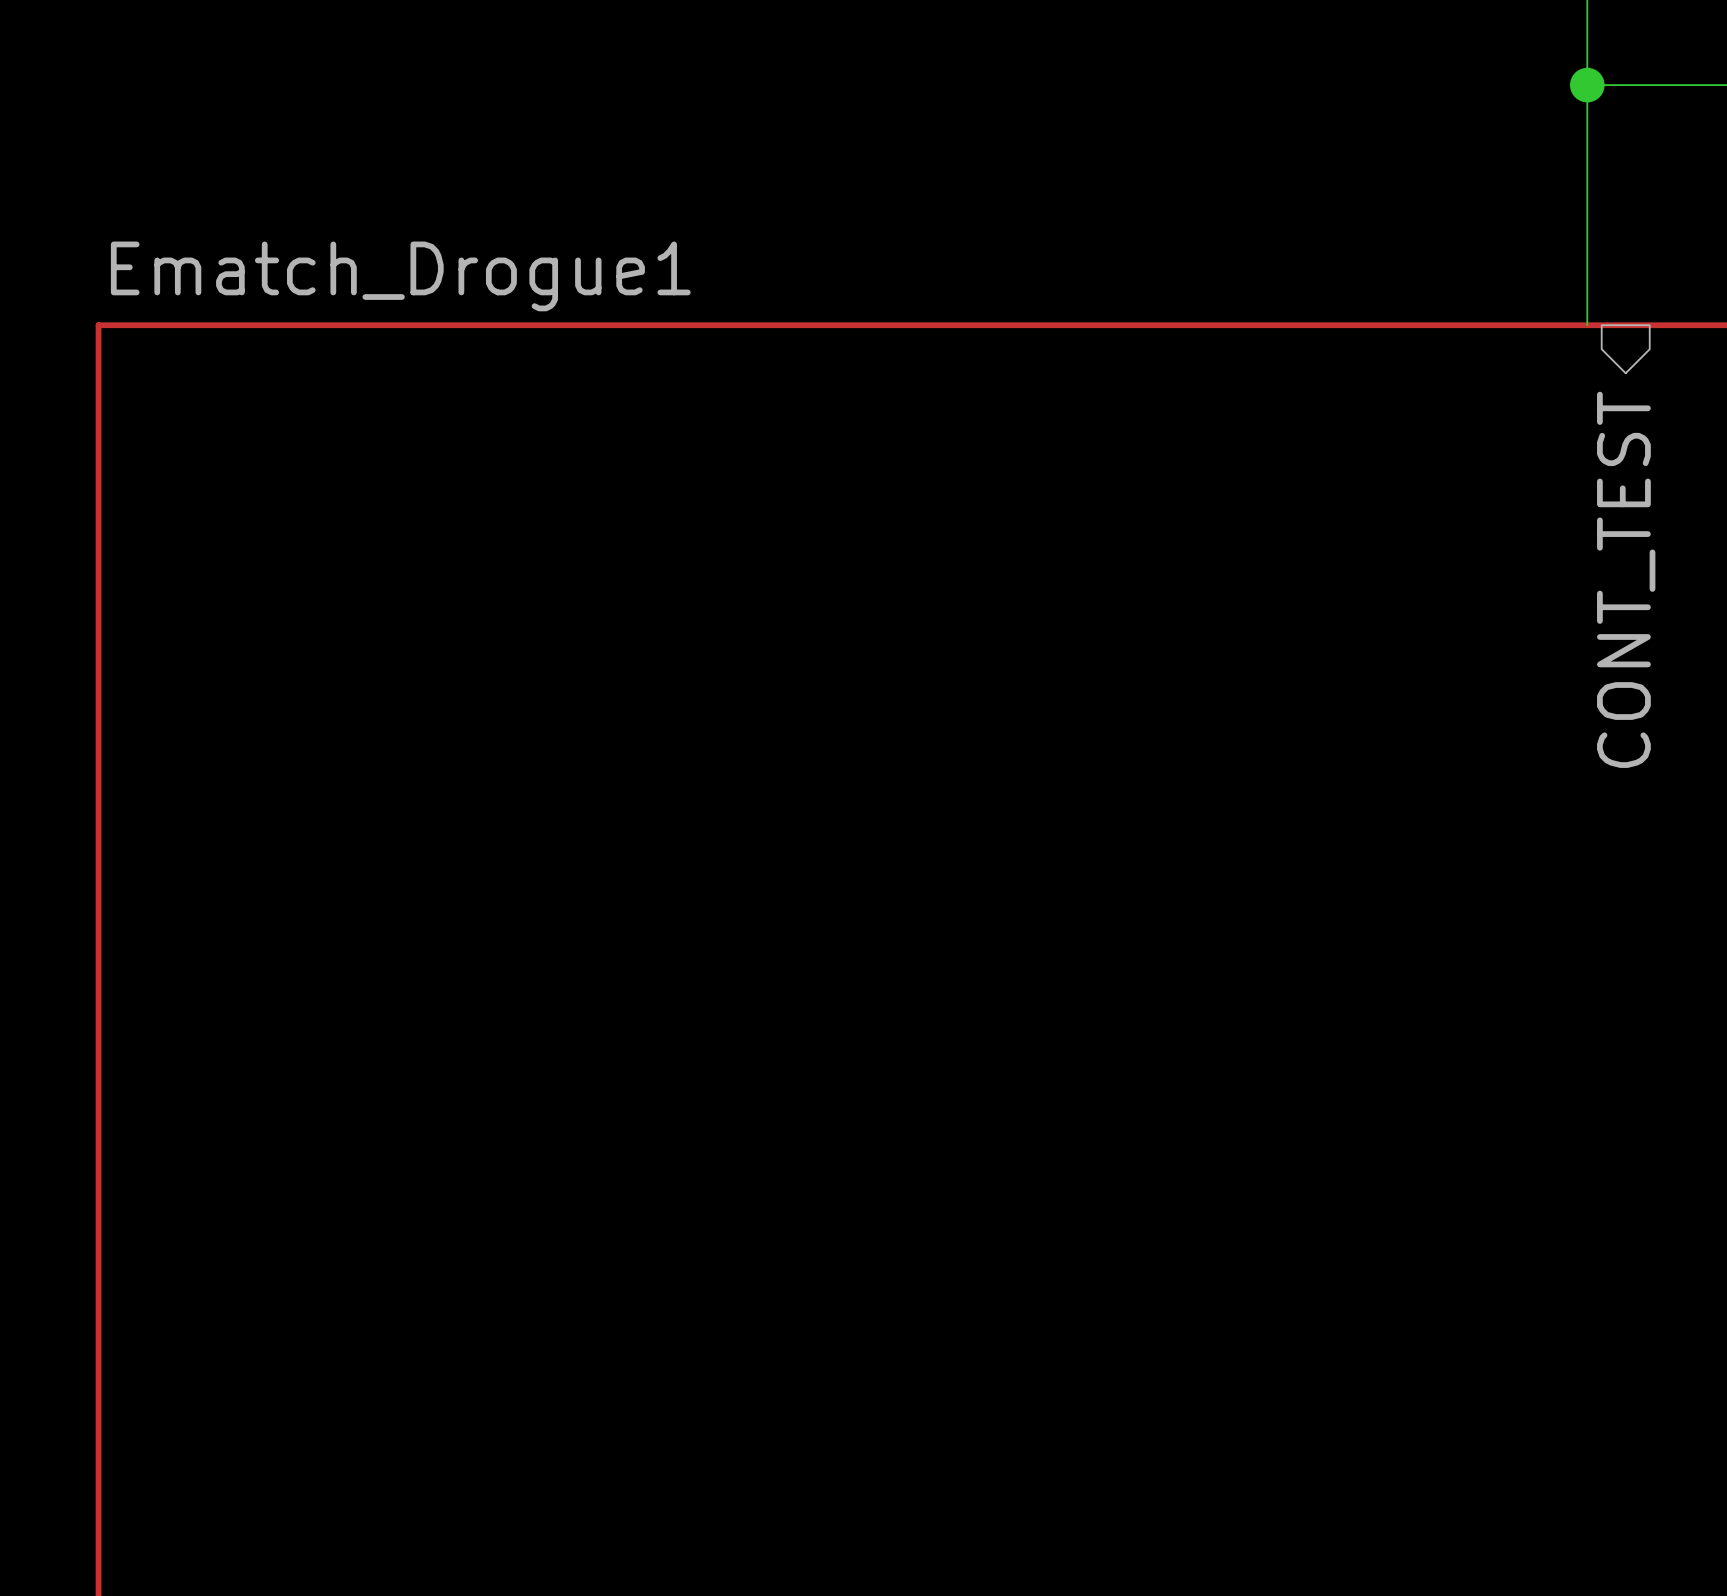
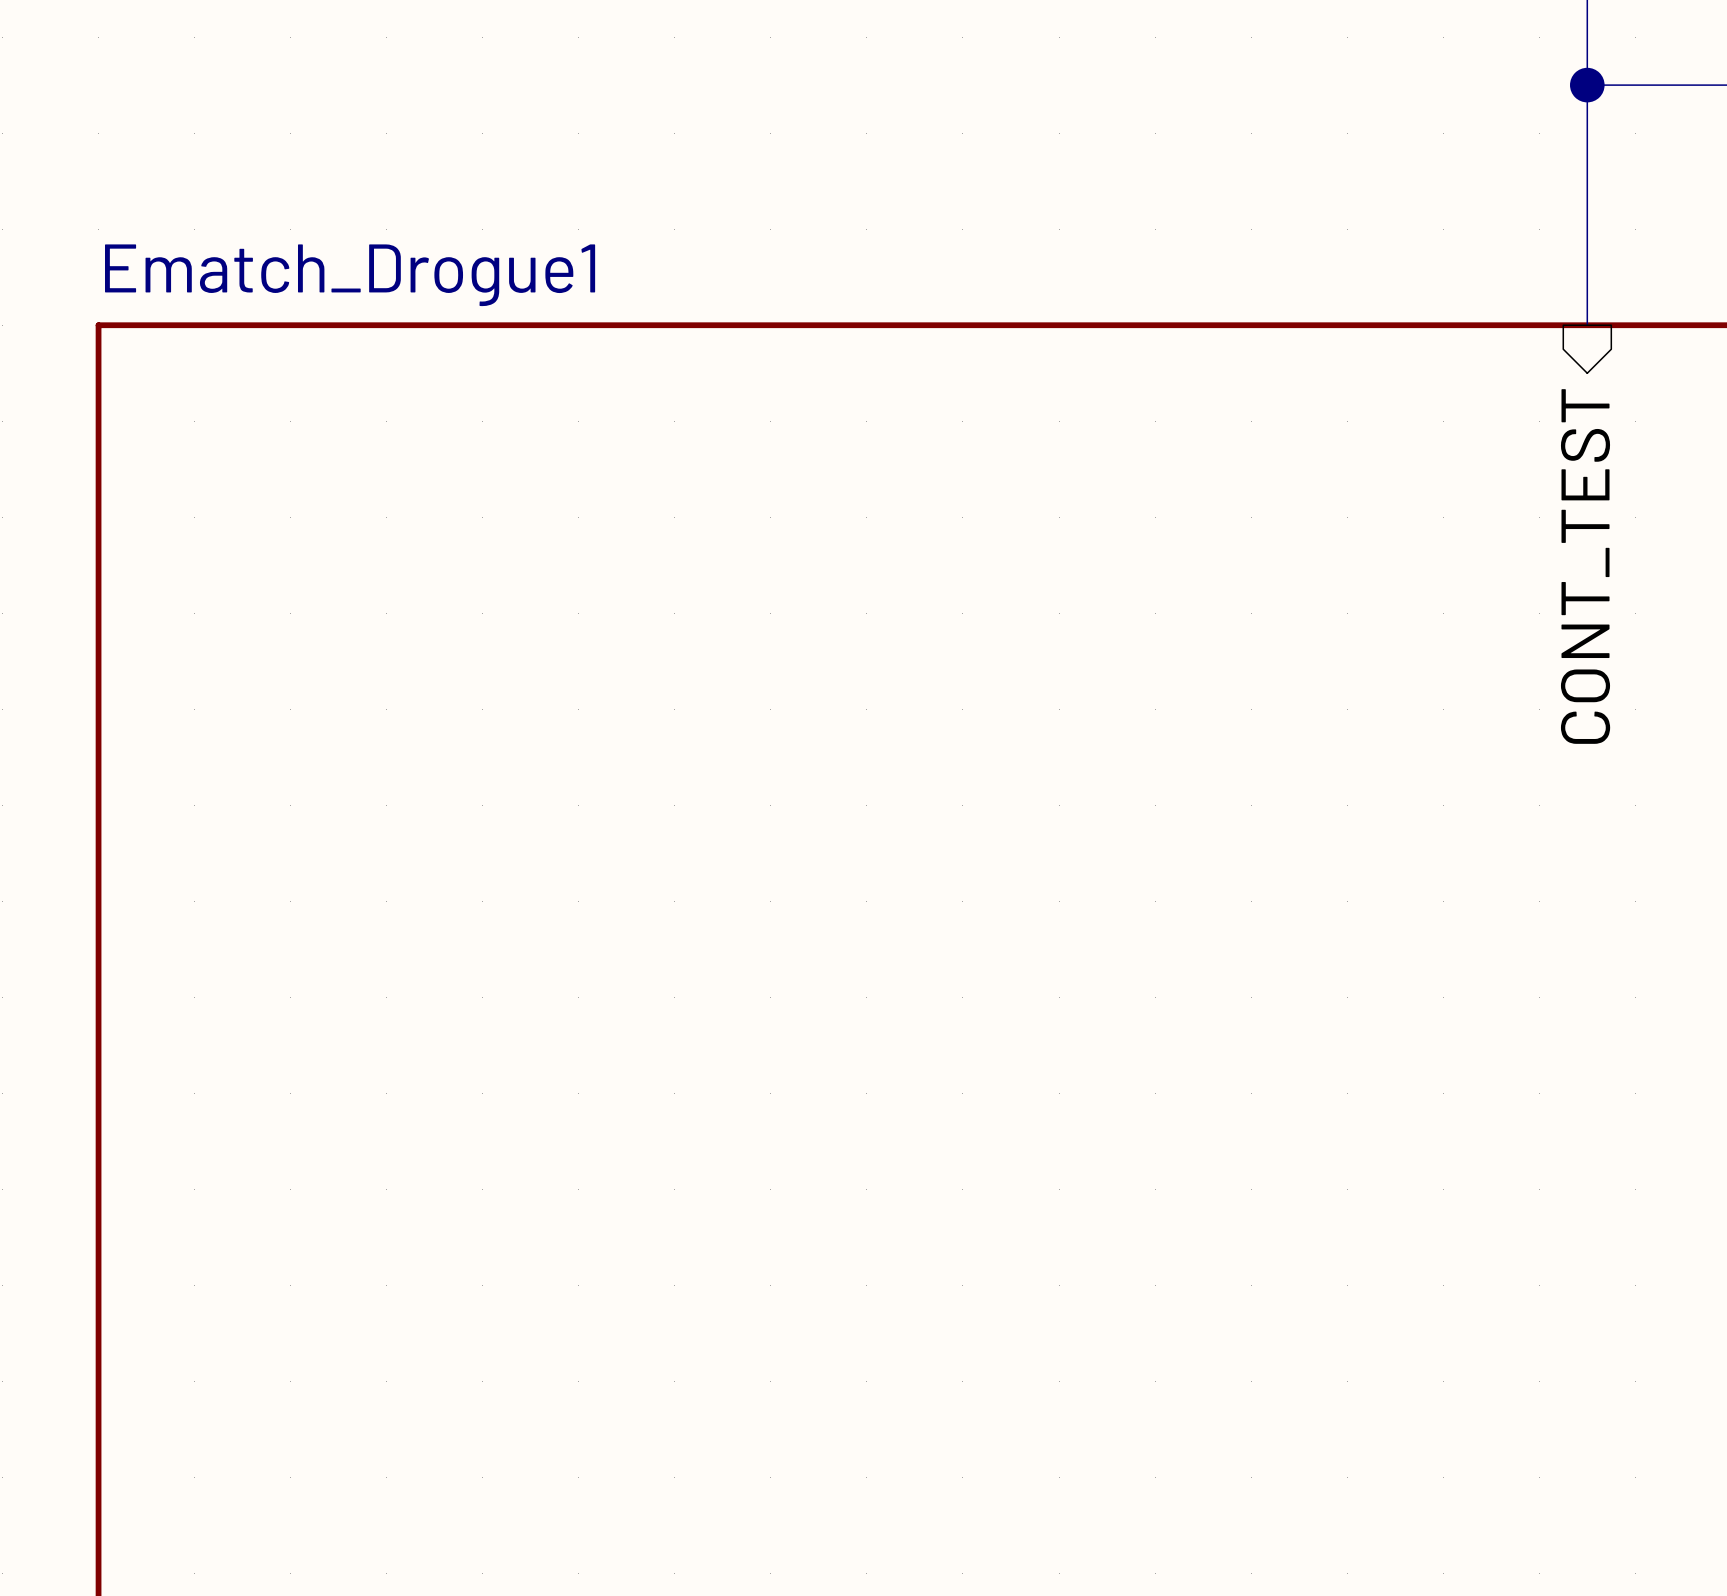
sheet pin position: CONT_TEST (1626, 579) -> CONT_TEST (1585, 566)

